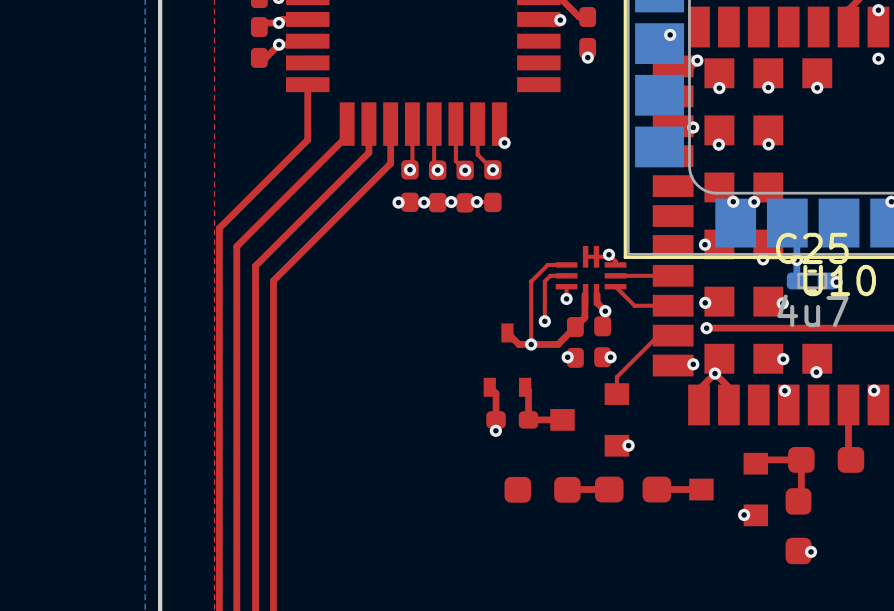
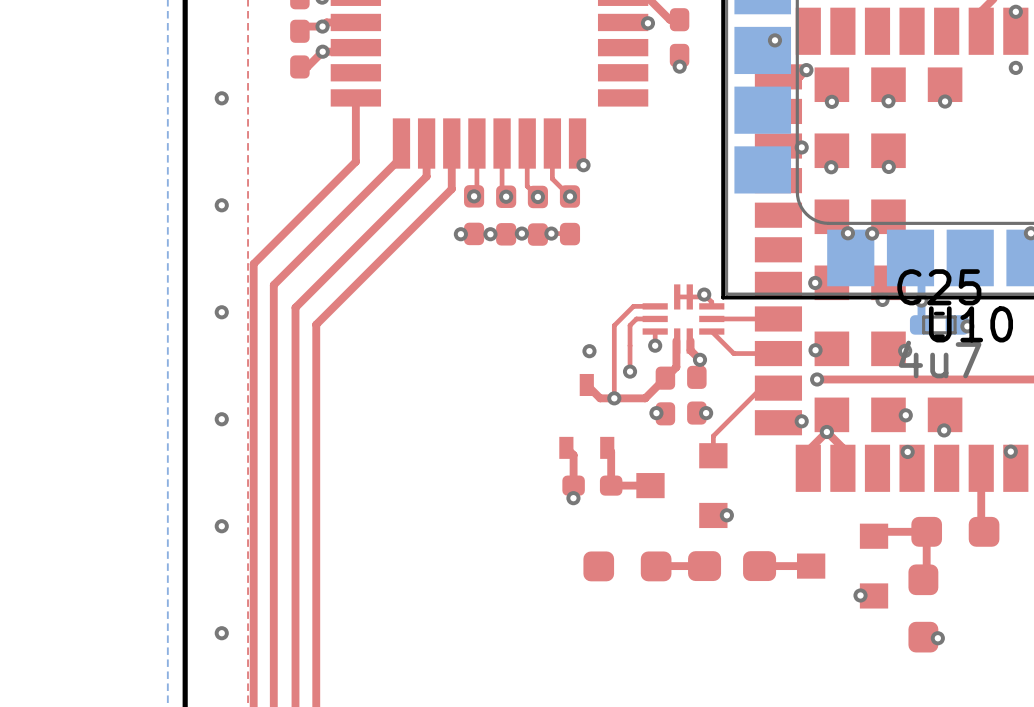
via: none -> (221, 98)
via: none -> (221, 205)
via: none -> (221, 312)
via: none -> (589, 351)
via: none -> (221, 419)
via: none -> (221, 526)
via: none -> (221, 633)

